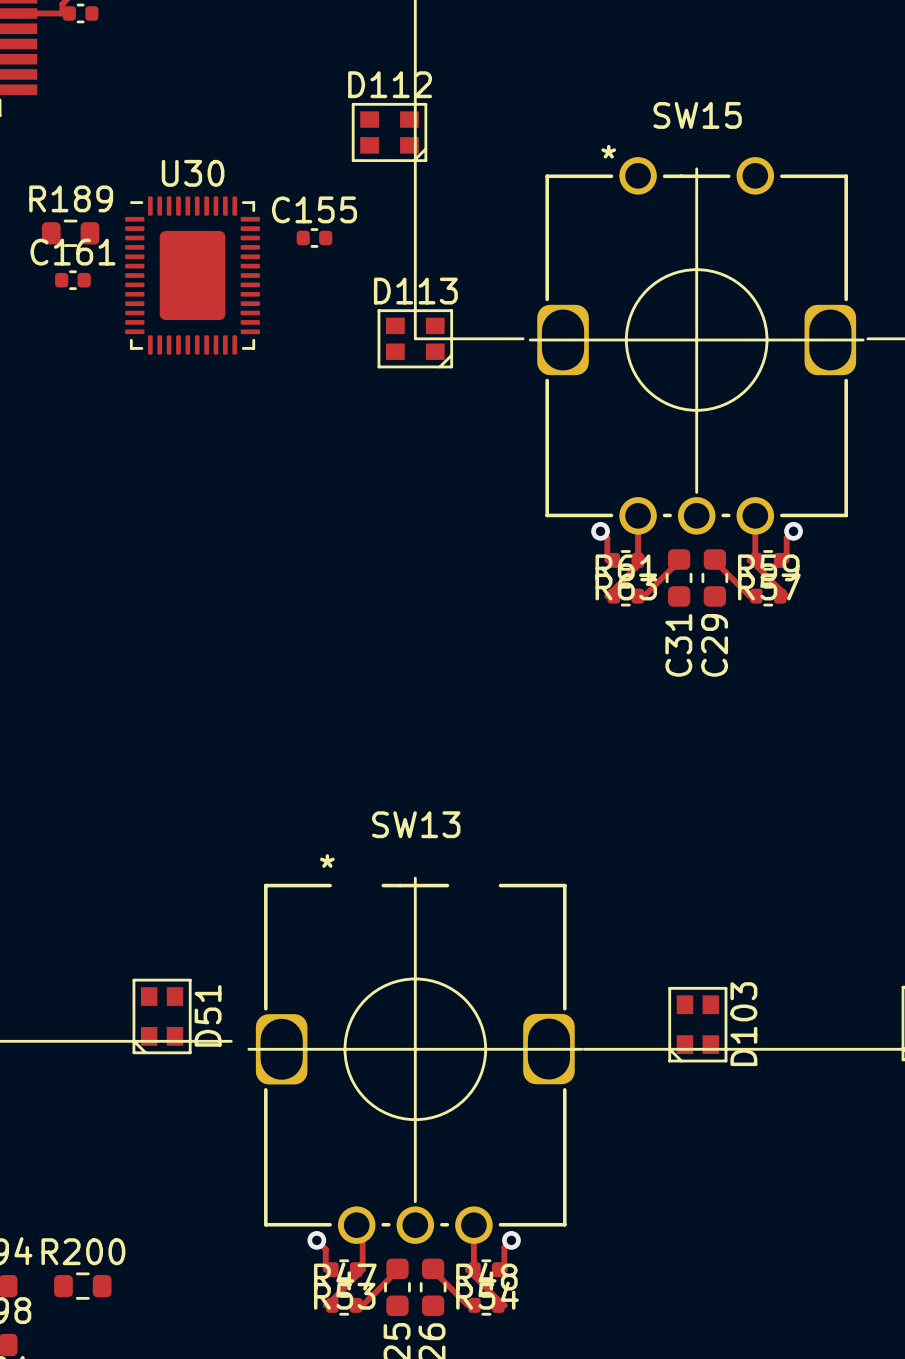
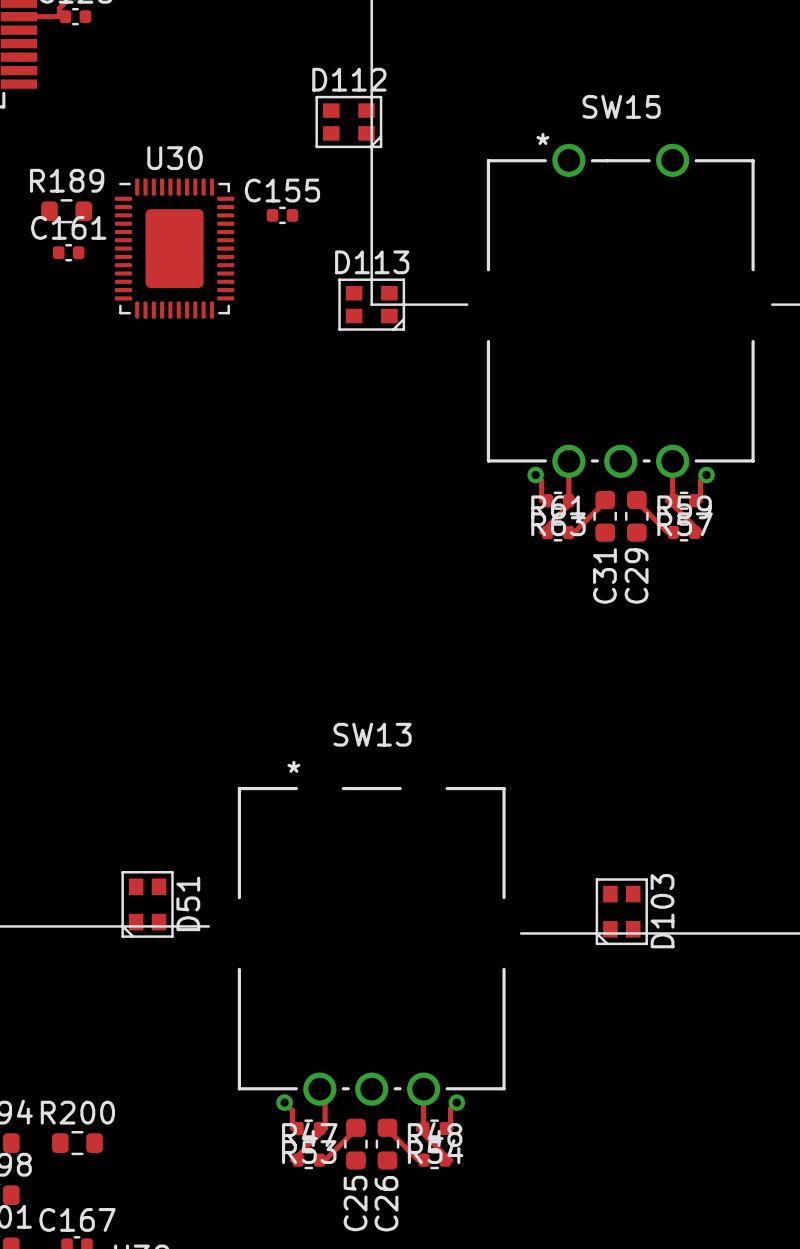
SW15 footprint: [528, 157, 865, 535] -> [486, 143, 755, 478]
SW13 footprint: [247, 876, 584, 1244] -> [237, 786, 506, 1106]

